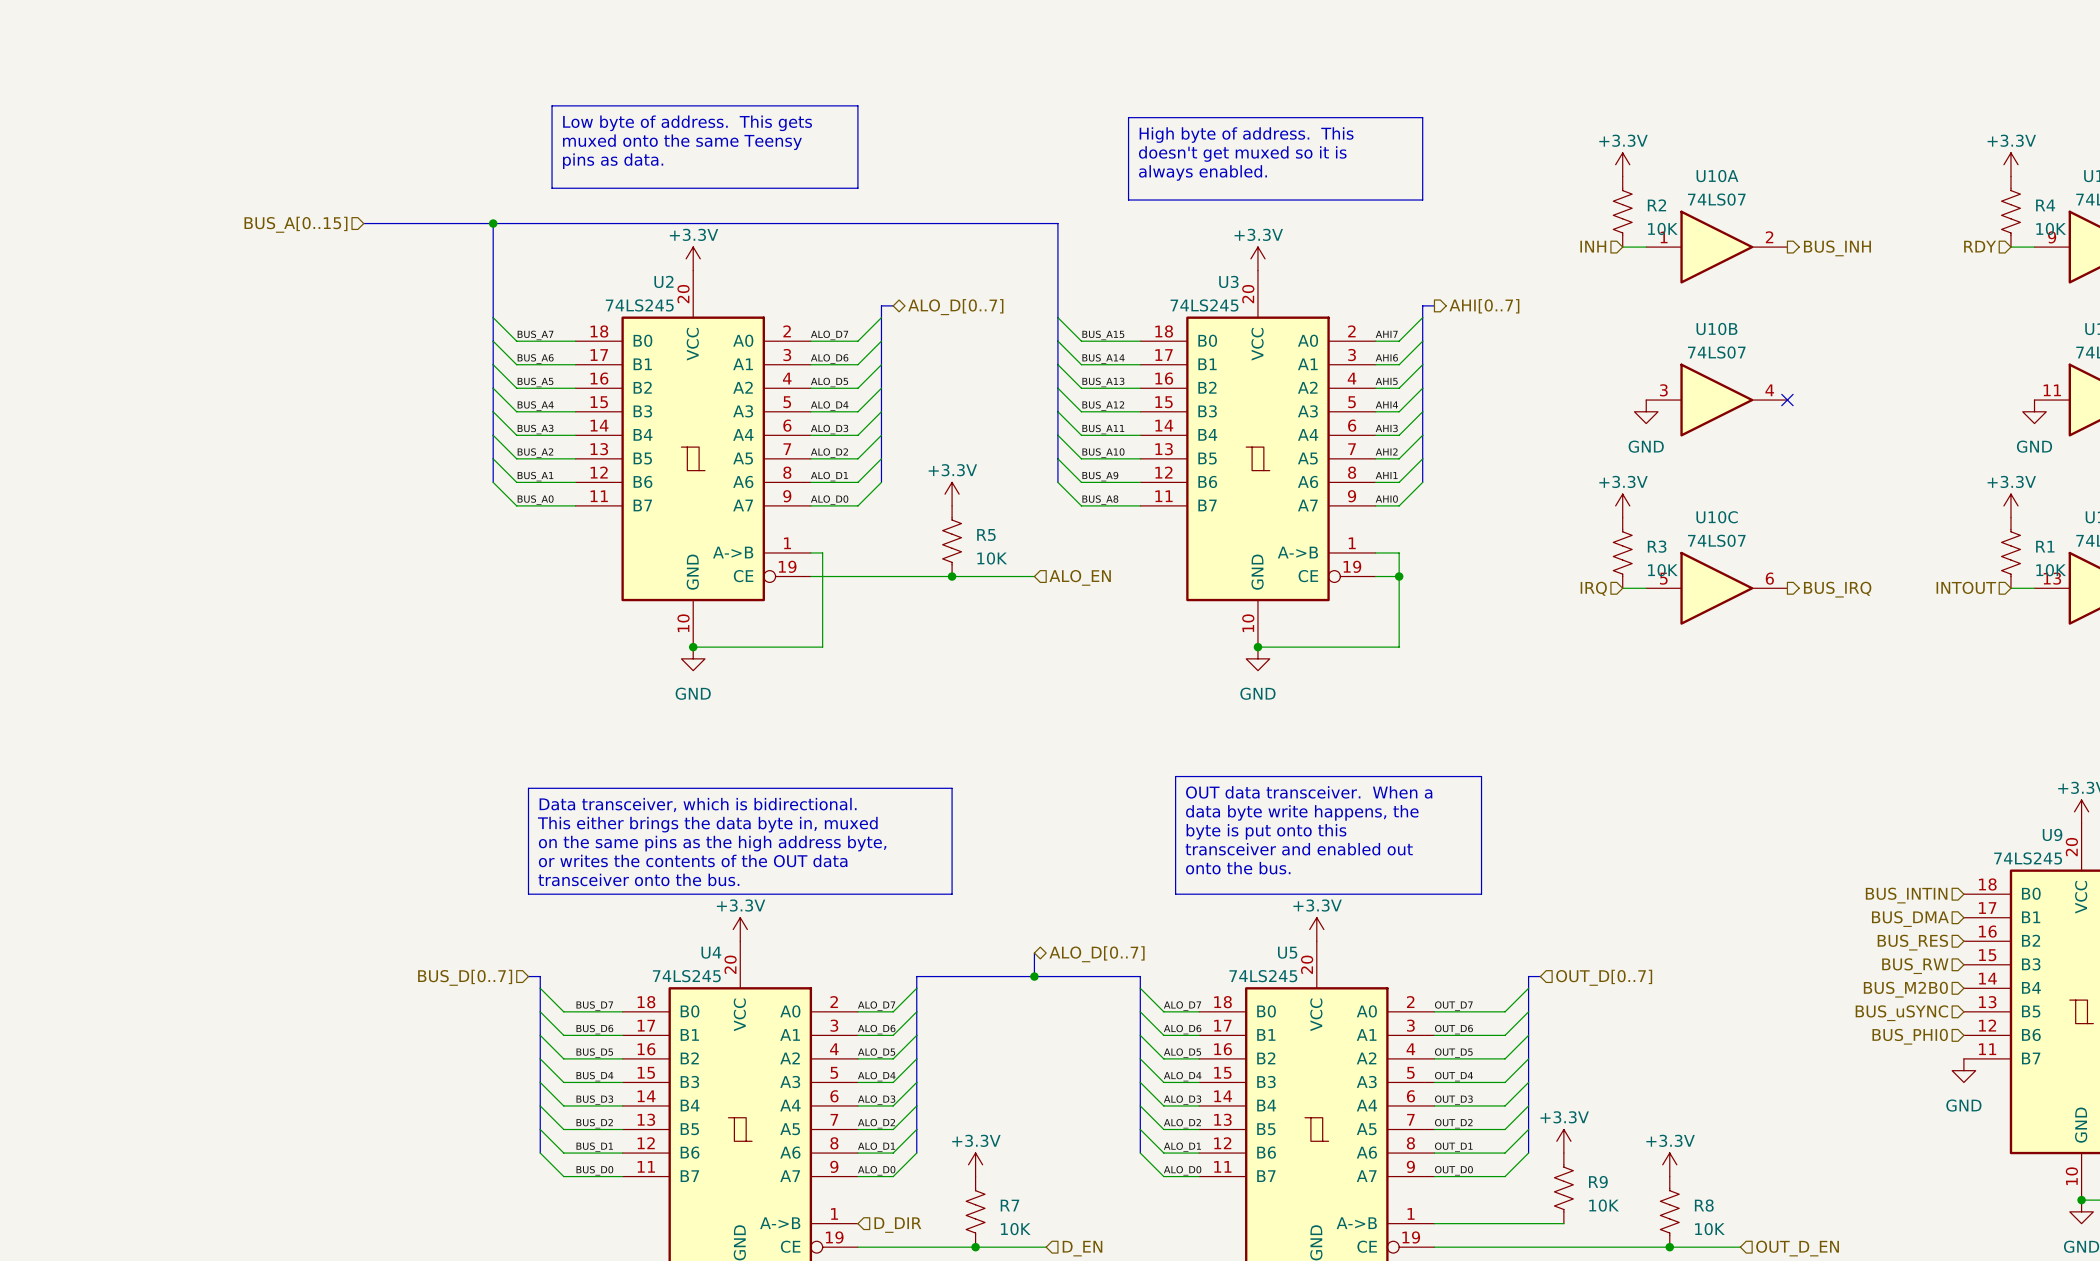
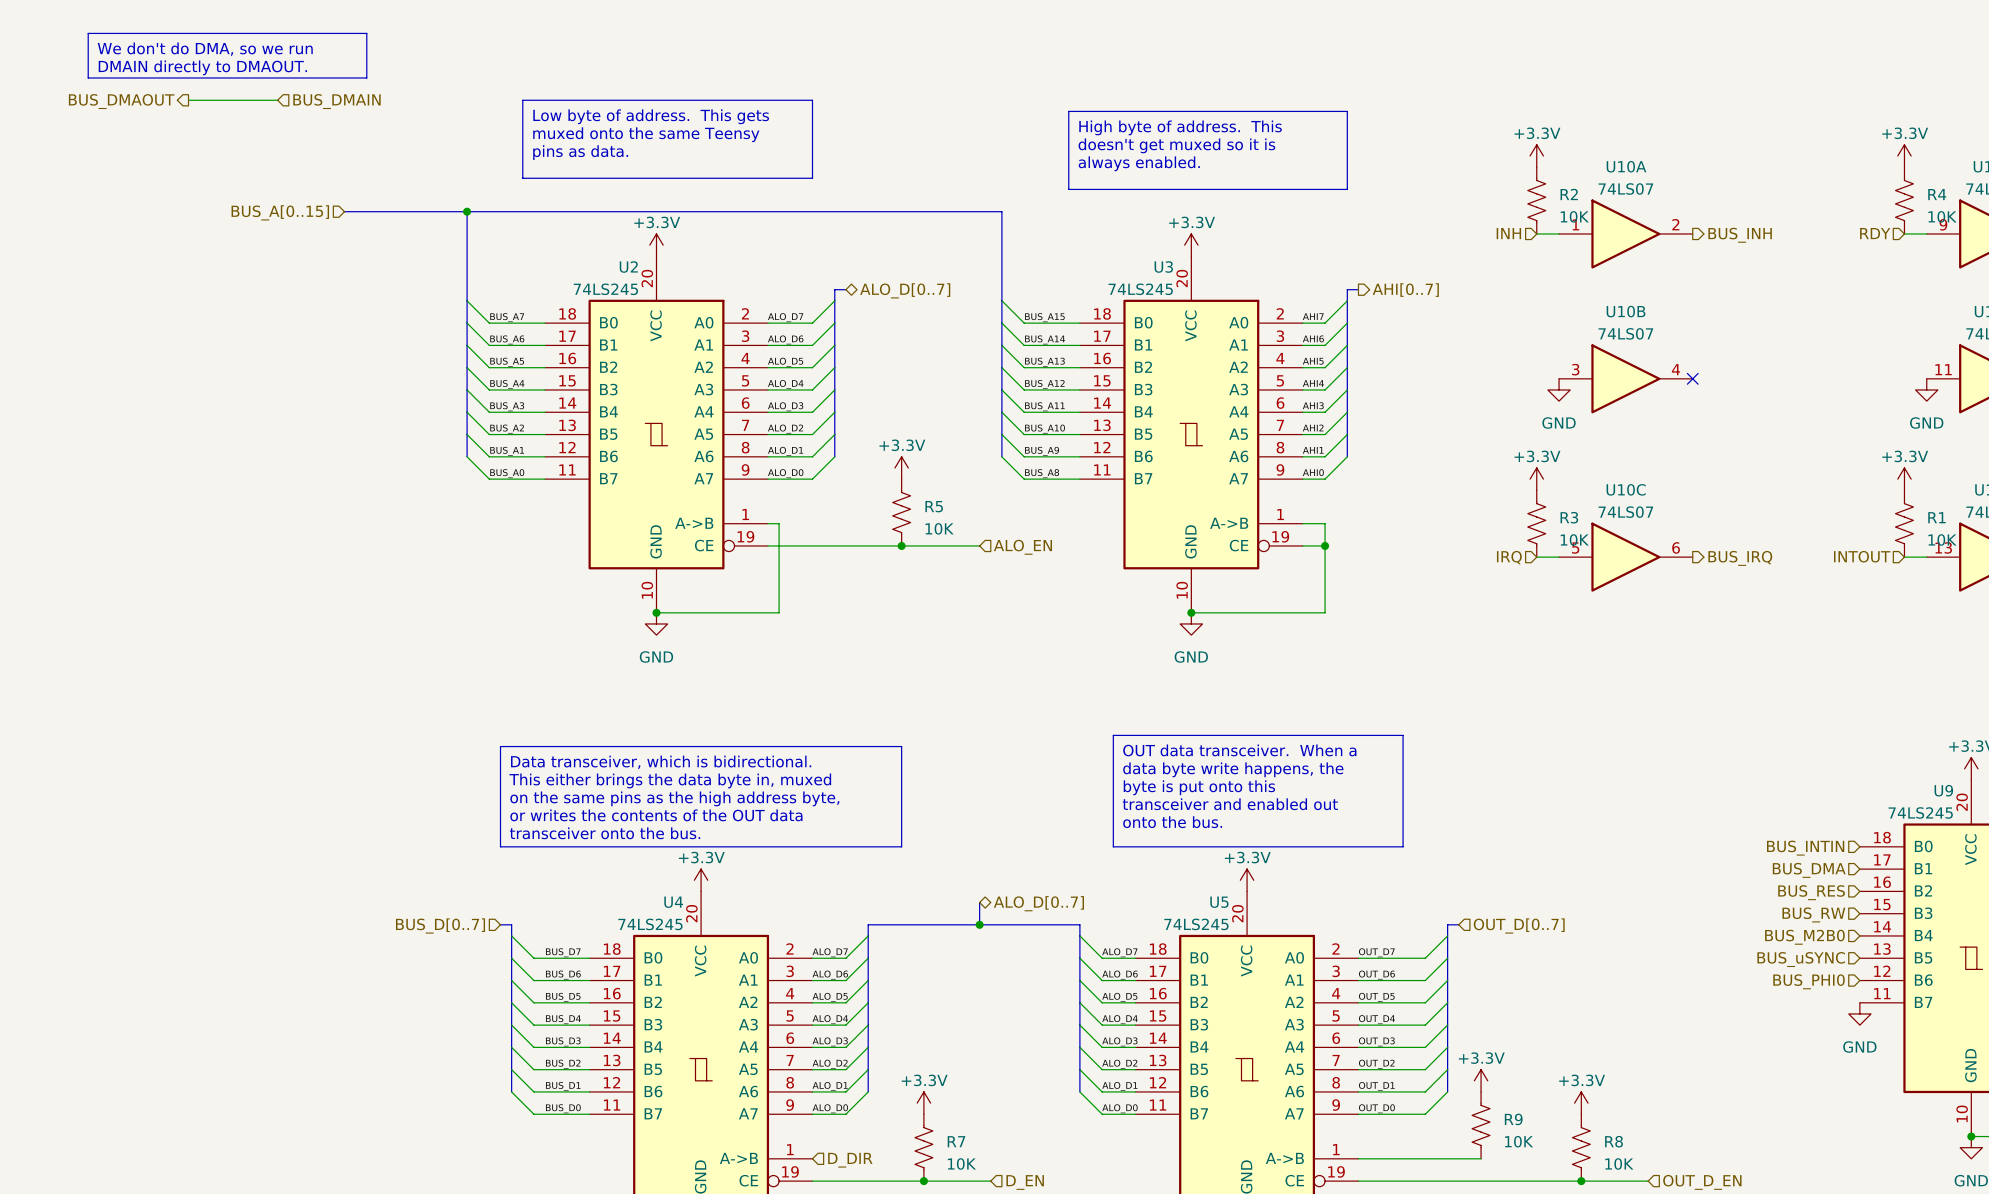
line: none -> (88, 33) (366, 33) (366, 77) (88, 77) (88, 33)
text: none -> We don't do DMA, so we run (205, 49)
text: none -> DMAIN directly to DMAOUT. (202, 67)
wire: none -> (188, 100) (277, 100)
hierarchical label: none -> BUS_DMAOUT (121, 101)
hierarchical label: none -> BUS_DMAIN (336, 101)

